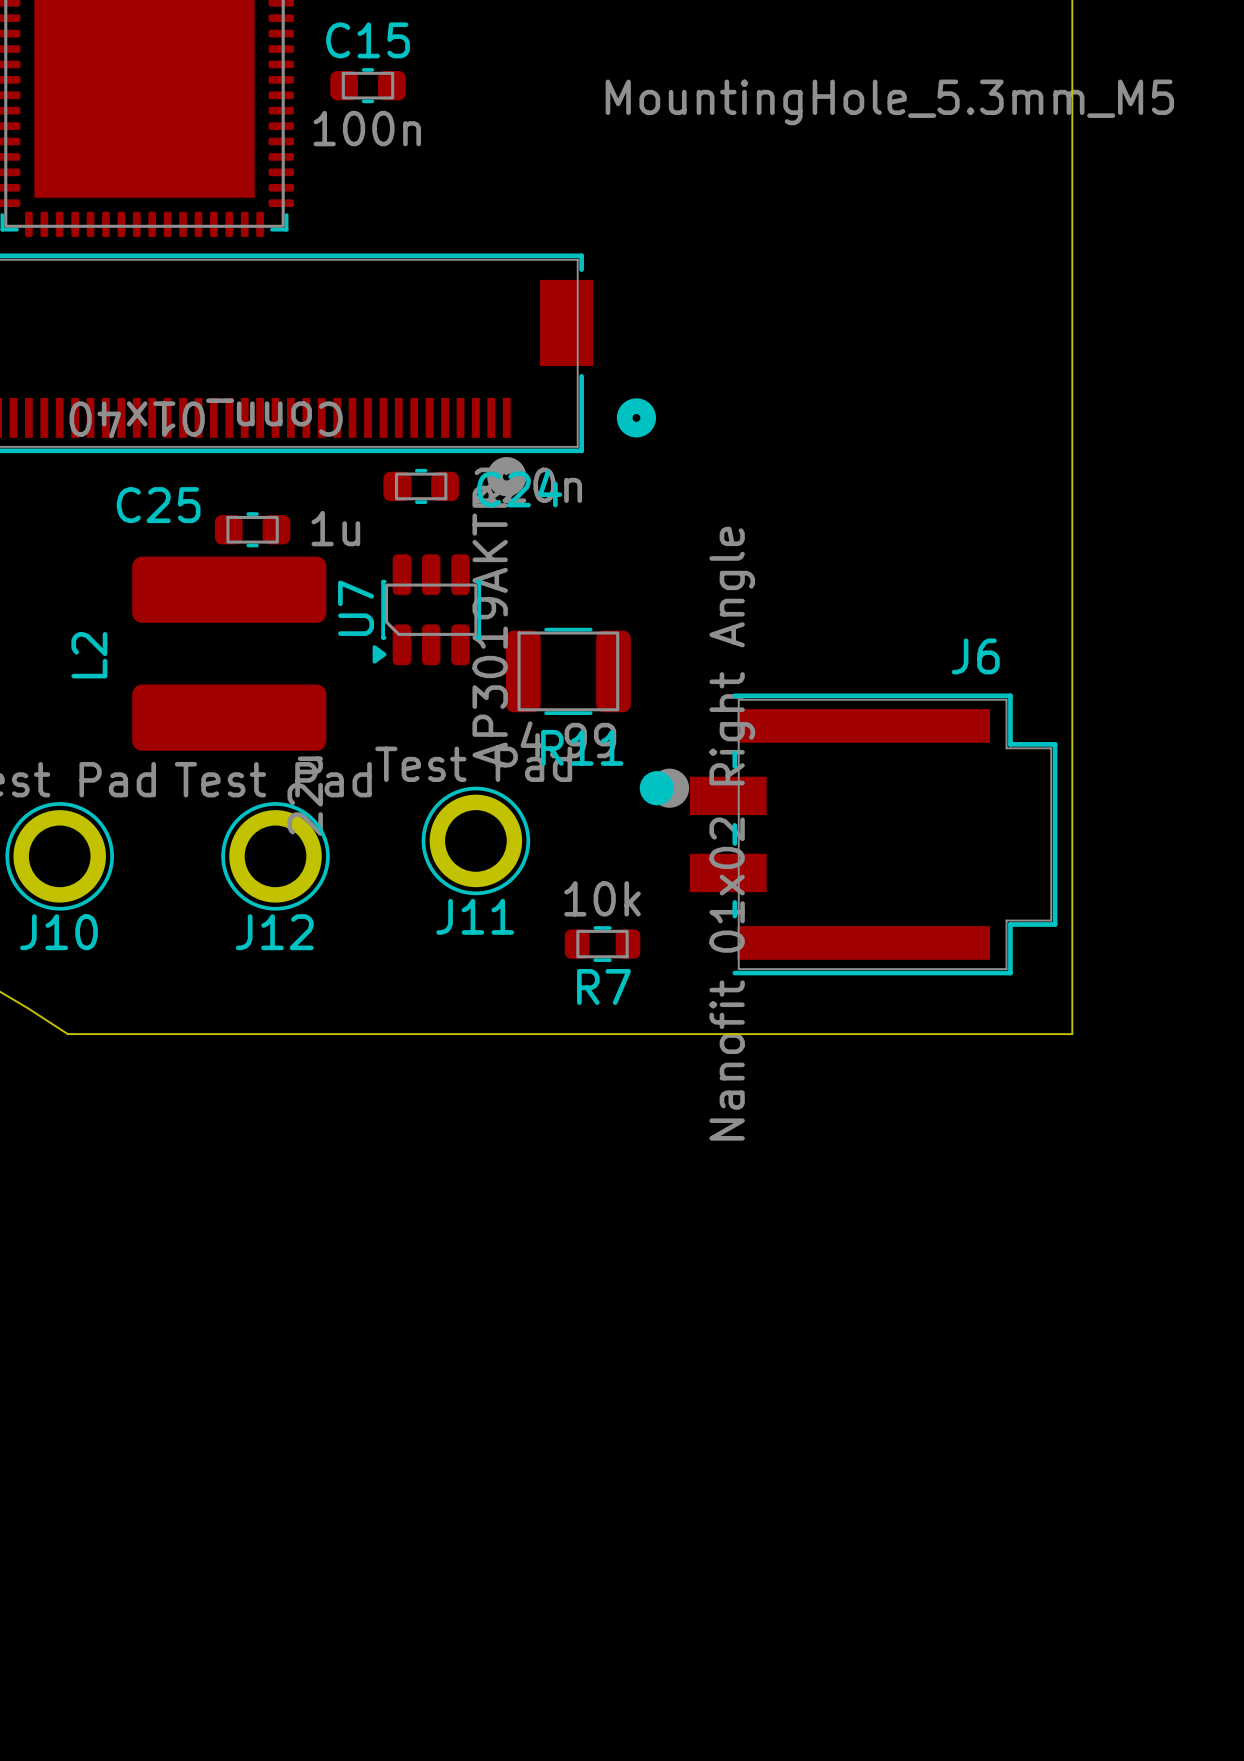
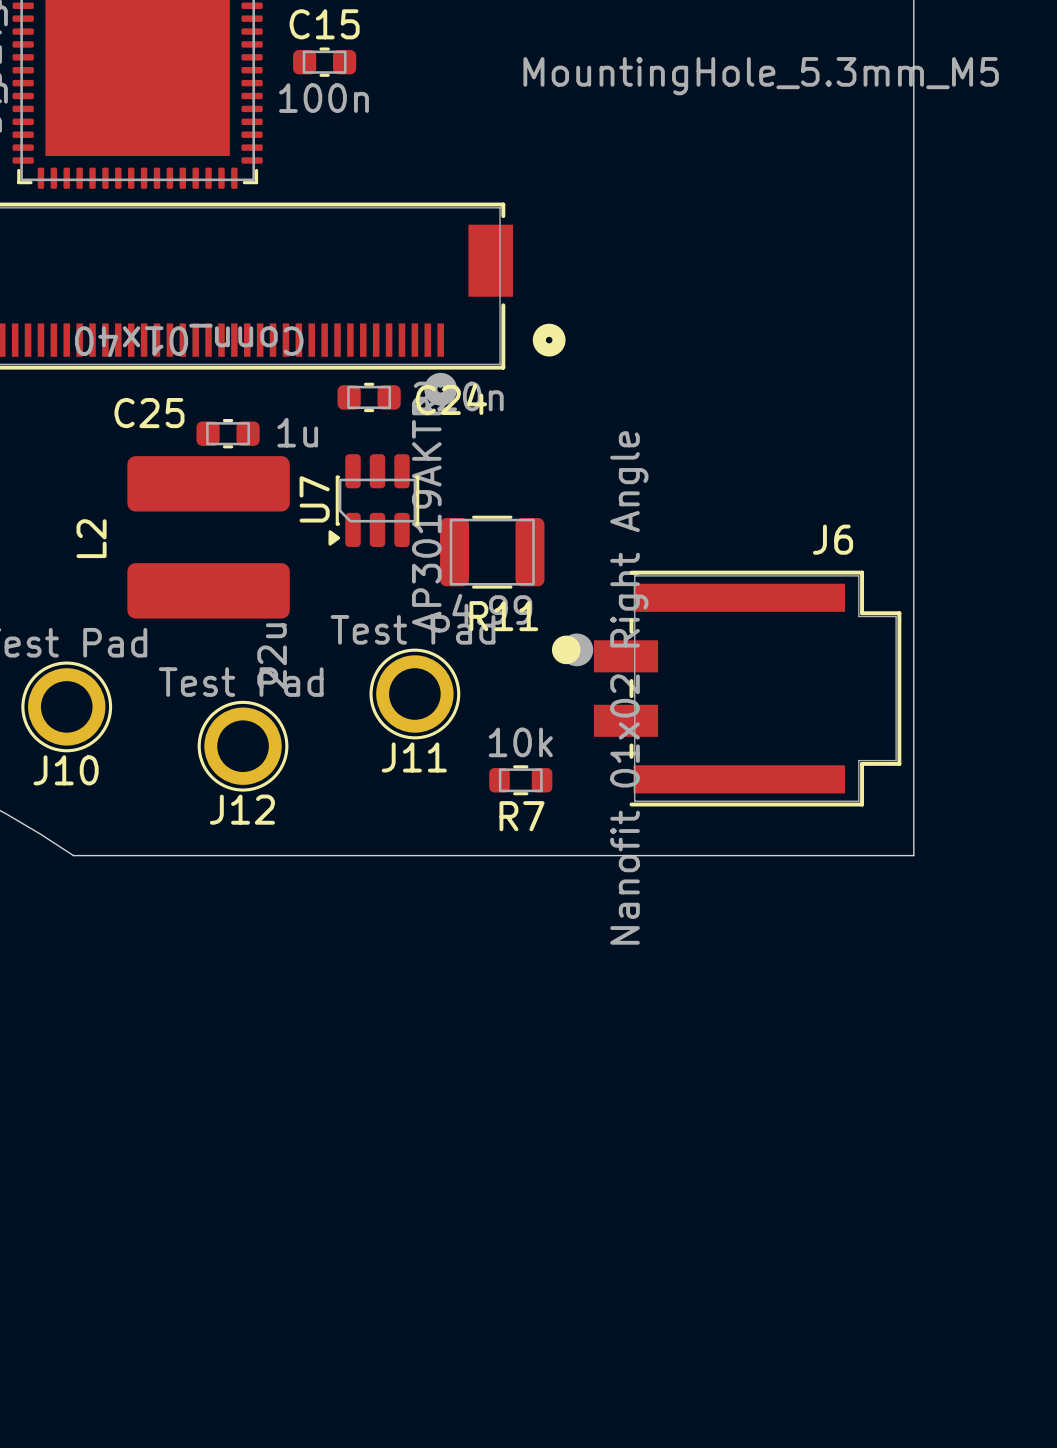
J12 position: (275, 856) -> (243, 746)

